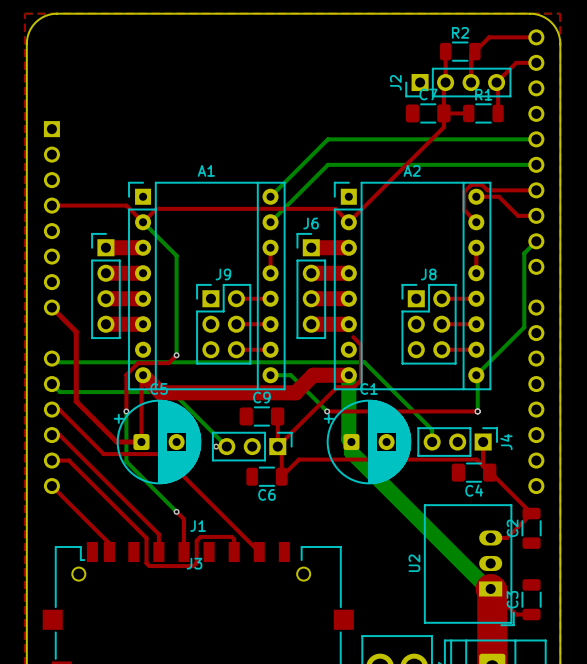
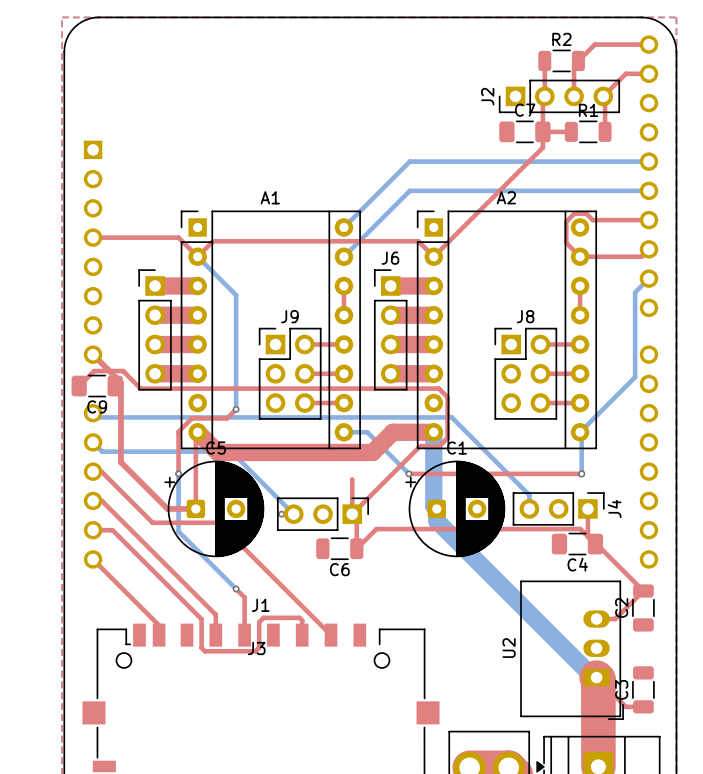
top track: (476, 196) (498, 196) (517, 215) (536, 215) -> (580, 256) (641, 256) (648, 249)
top track: none -> (79, 386) (94, 371) (123, 371) (140, 388) (438, 388)
C9 name position: C9 (261, 397) -> C9 (97, 406)
C9 position: (261, 416) -> (97, 386)

